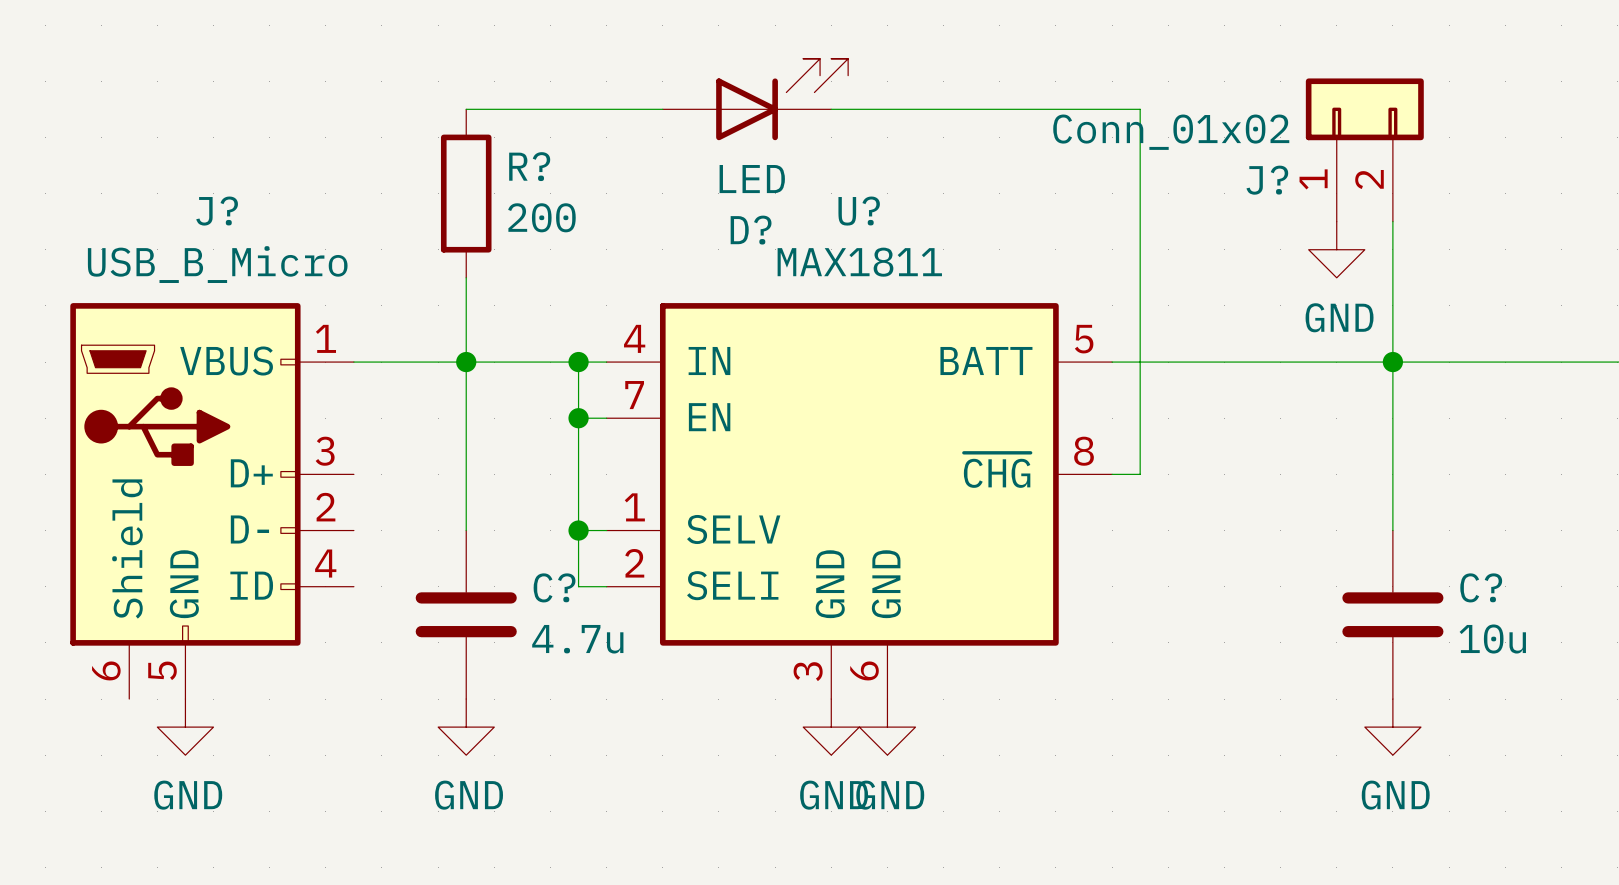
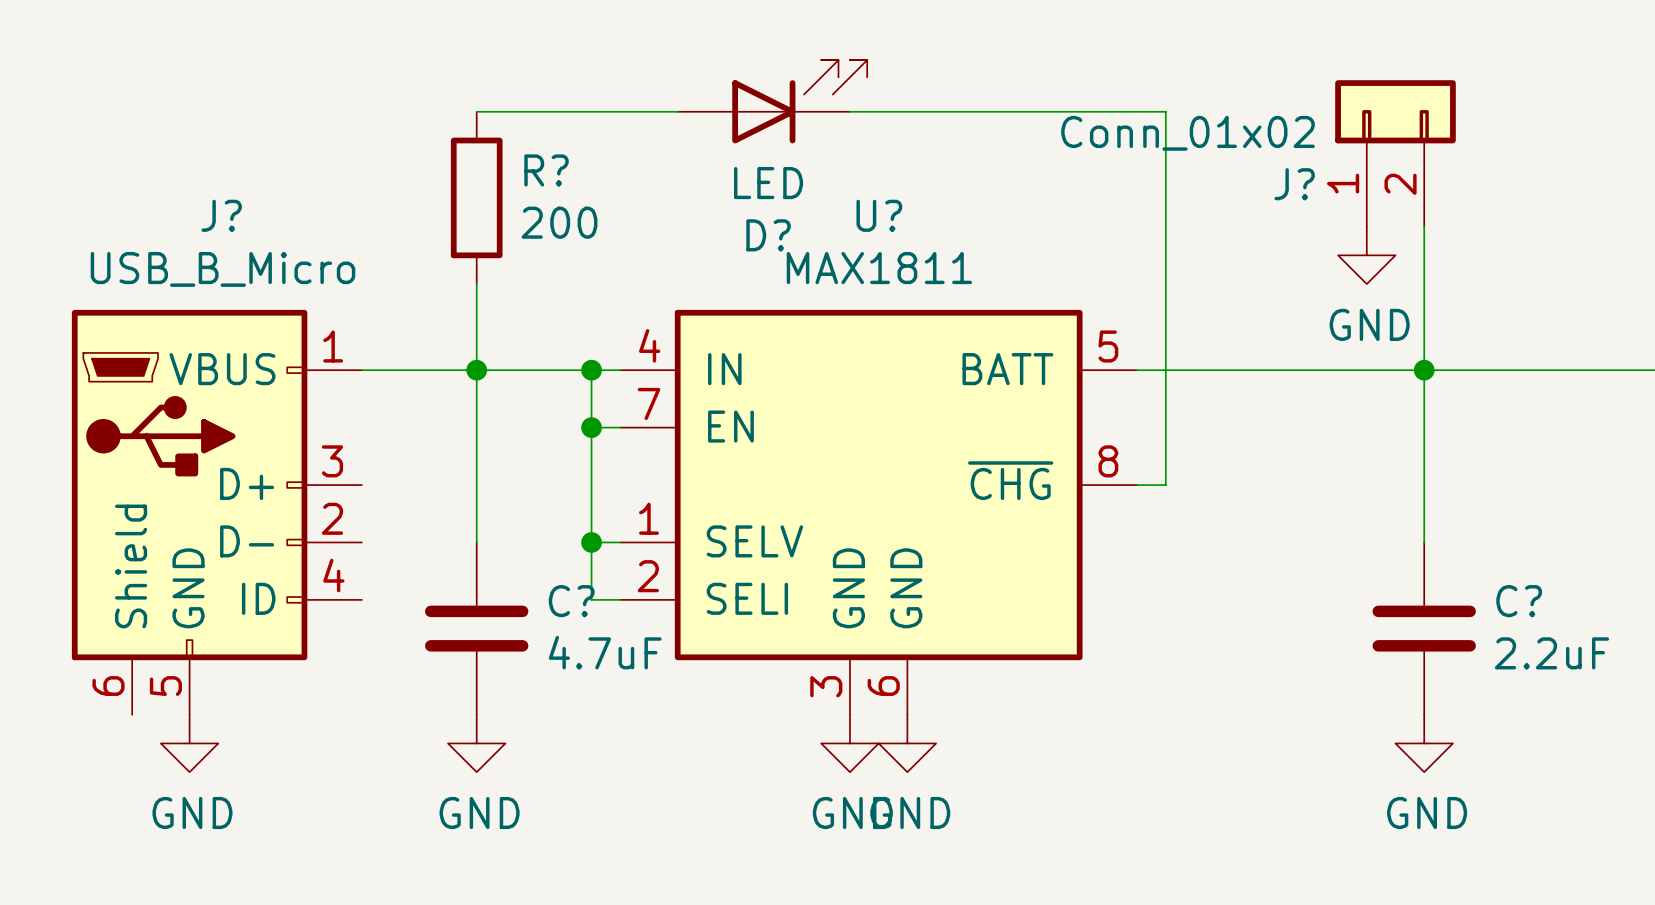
C? value: 4.7u (577, 639) -> 4.7uF (605, 652)
C? value: 10u (1492, 639) -> 2.2uF (1551, 653)

